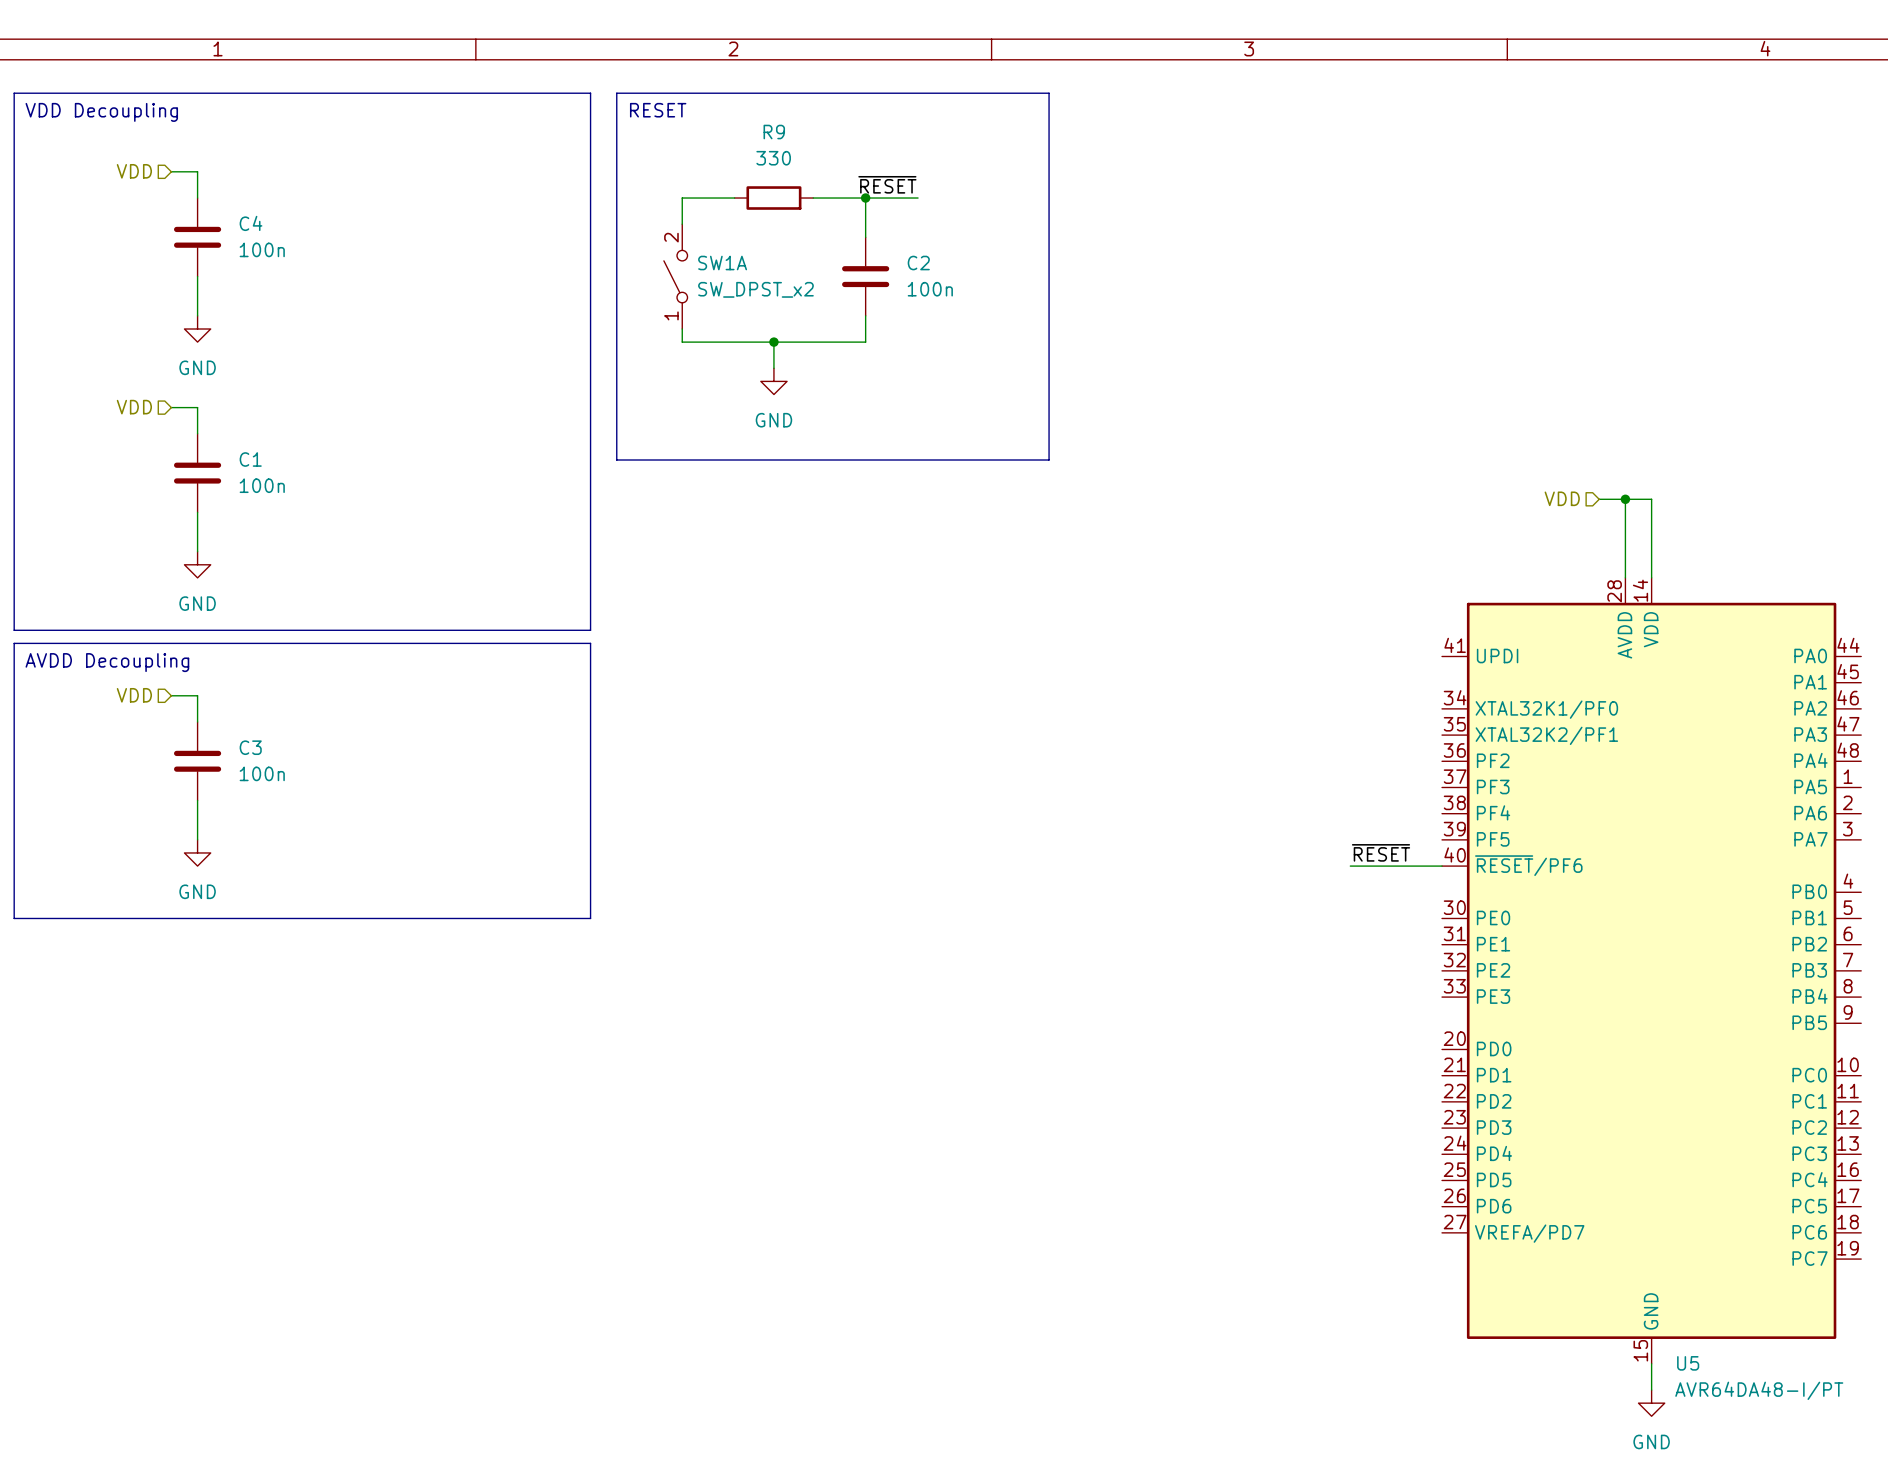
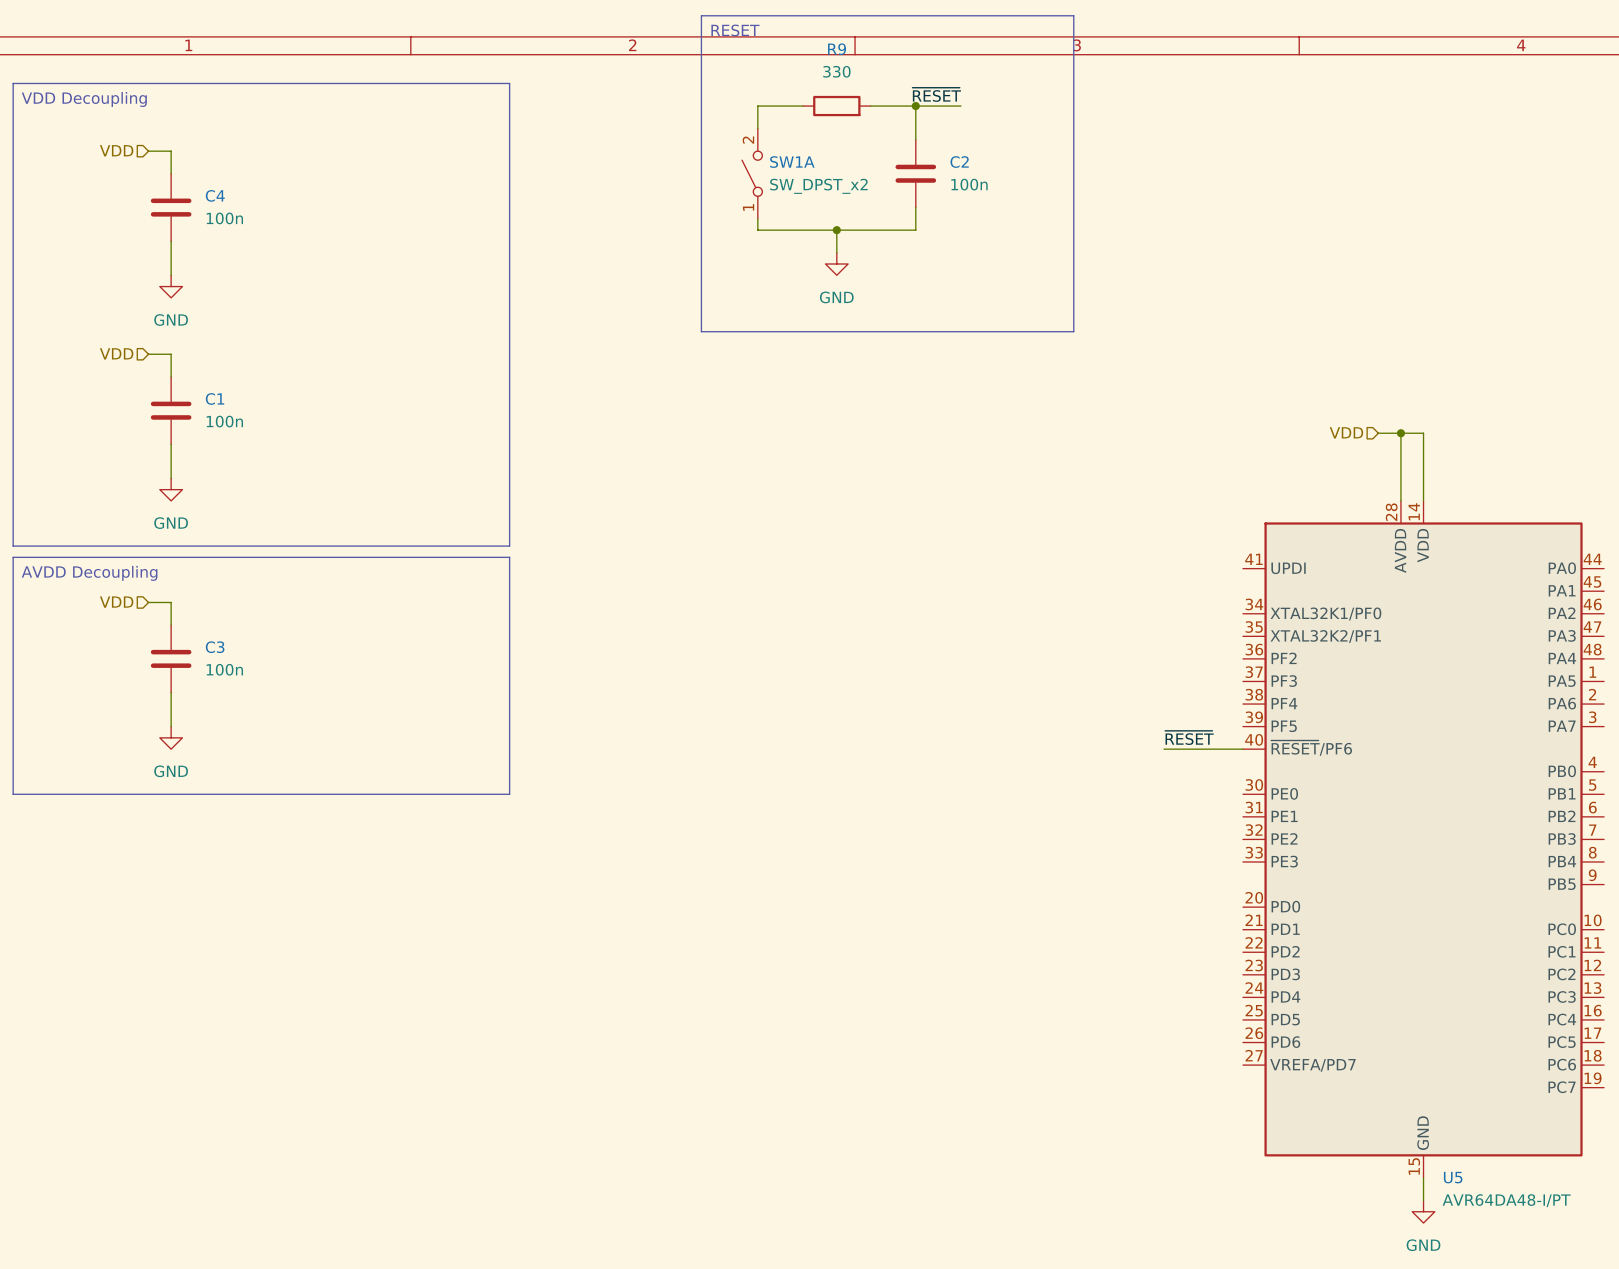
line: (616, 93) (1049, 93) (1049, 460) (616, 460) (616, 93) -> (701, 15) (1073, 15) (1073, 331) (701, 331) (701, 15)
text position: RESET (658, 110) -> RESET (735, 30)
junction: none -> (915, 106)
label position: ~{RESET} (887, 184) -> ~{RESET} (936, 94)
wire: (734, 198) (682, 198) (682, 224) -> (802, 106) (757, 106) (757, 128)
R9 position: (773, 198) -> (836, 106)
wire: (813, 198) (918, 198) -> (870, 106) (960, 106)
wire: (865, 198) (865, 237) -> (915, 106) (915, 139)
junction: (865, 198) -> none
junction: none -> (836, 230)
SW1A position: (675, 276) -> (752, 173)
C2 position: (865, 276) -> (915, 173)
wire: (865, 315) (865, 342) (682, 342) (682, 329) -> (915, 207) (915, 230) (757, 230) (757, 218)
wire: (773, 342) (773, 368) -> (836, 230) (836, 252)
junction: (773, 342) -> none
power symbol position: GND (773, 381) -> GND (836, 264)

